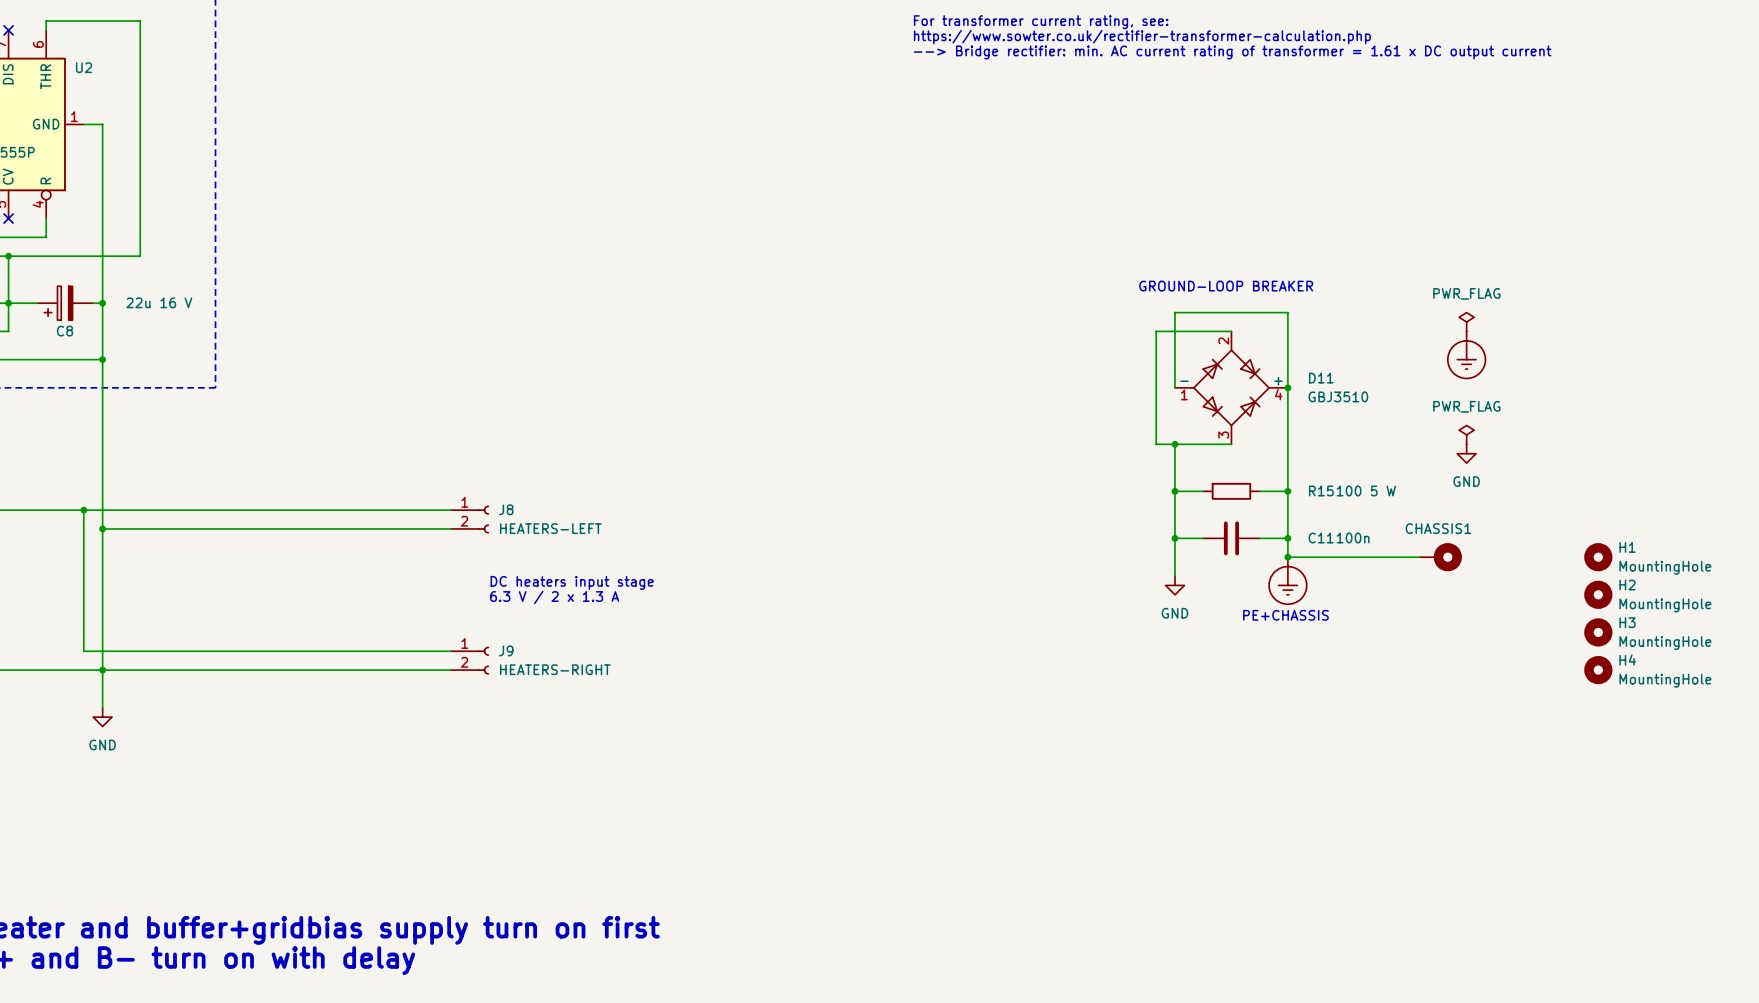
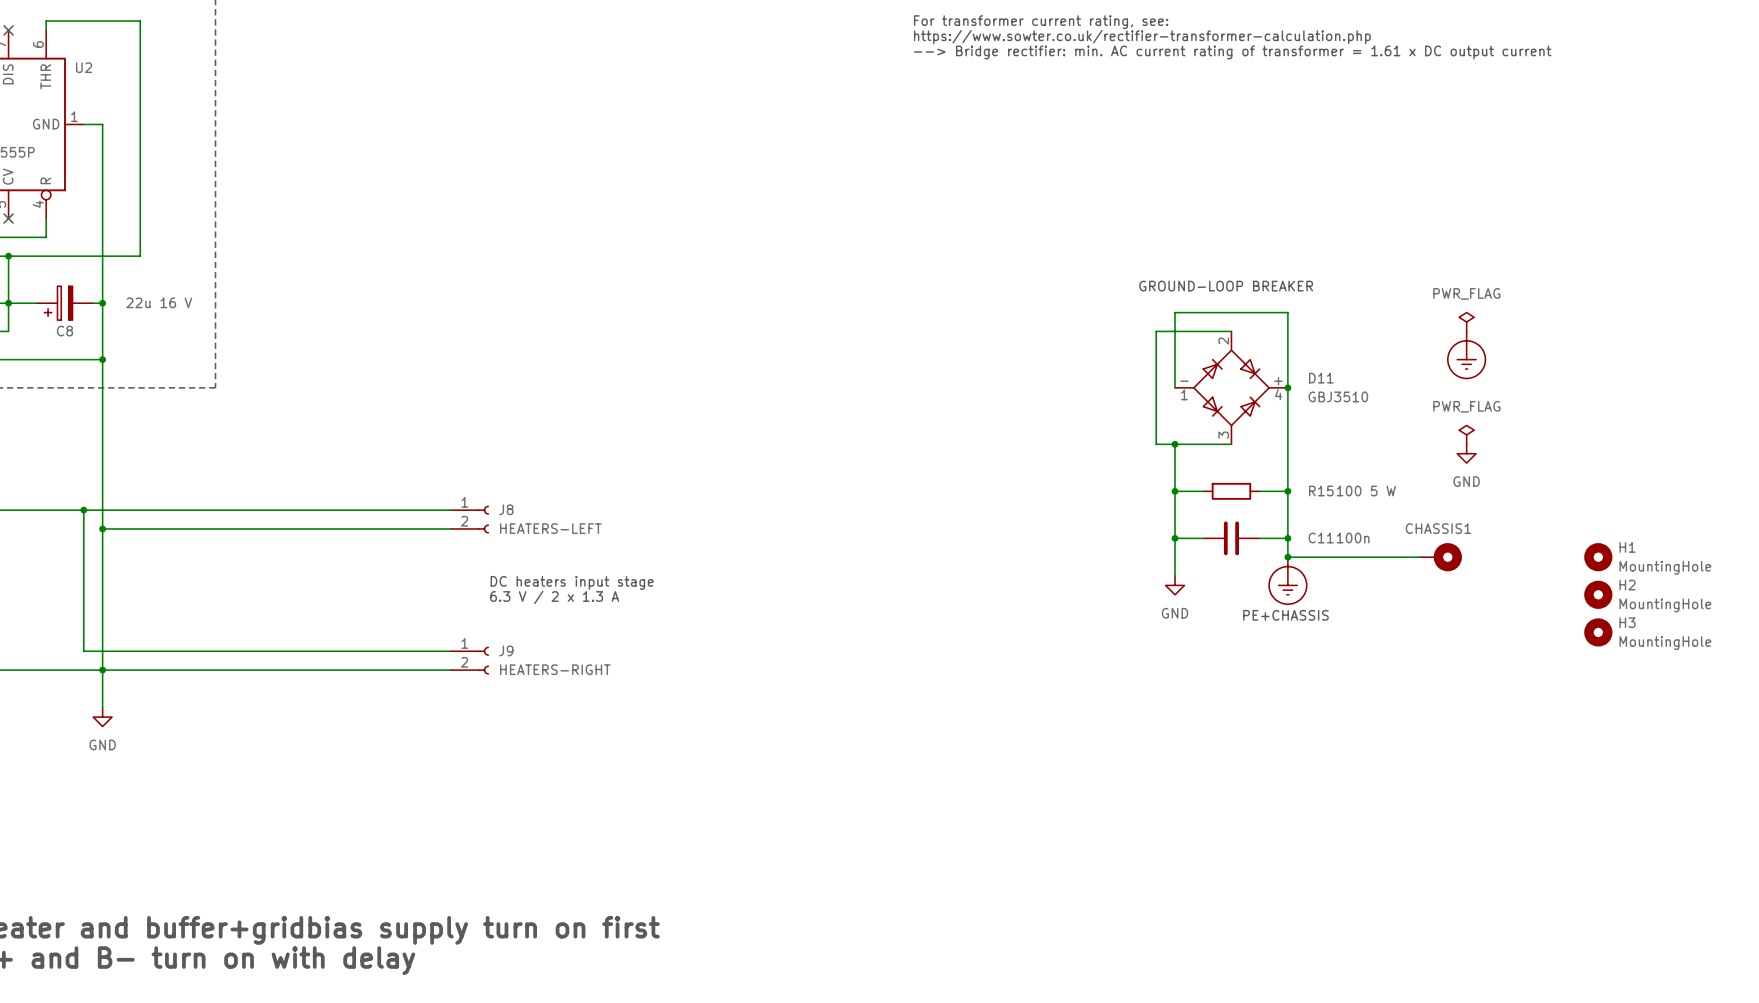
H4: MountingHole (1598, 670) -> none

